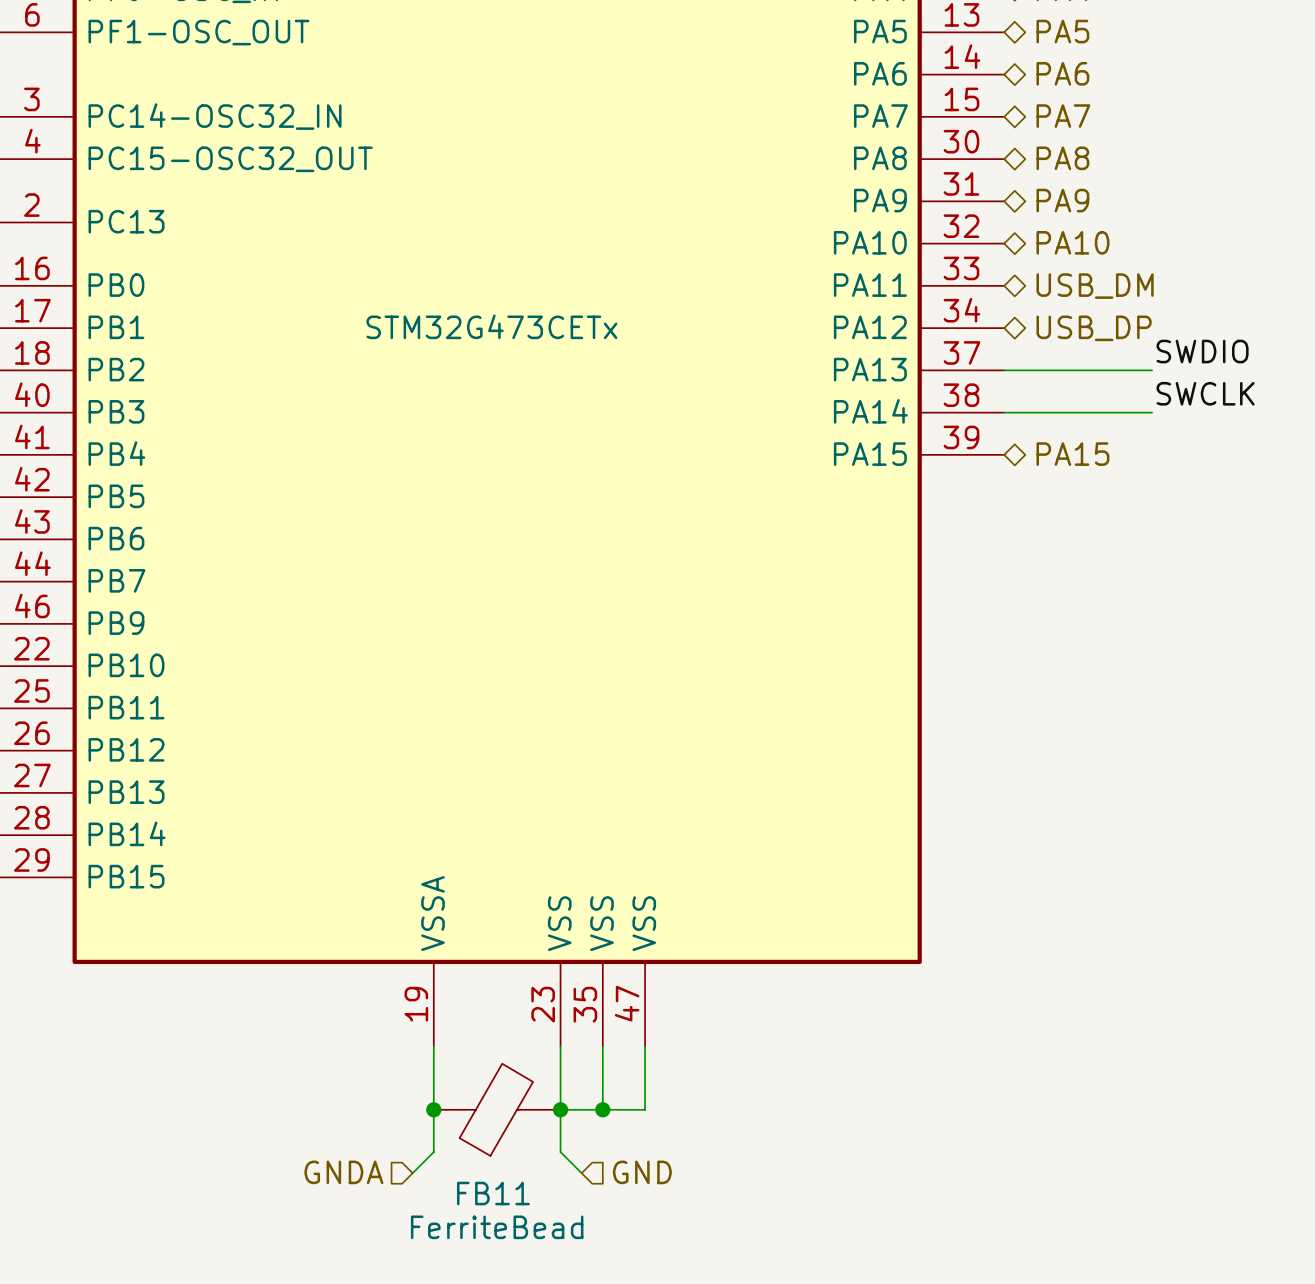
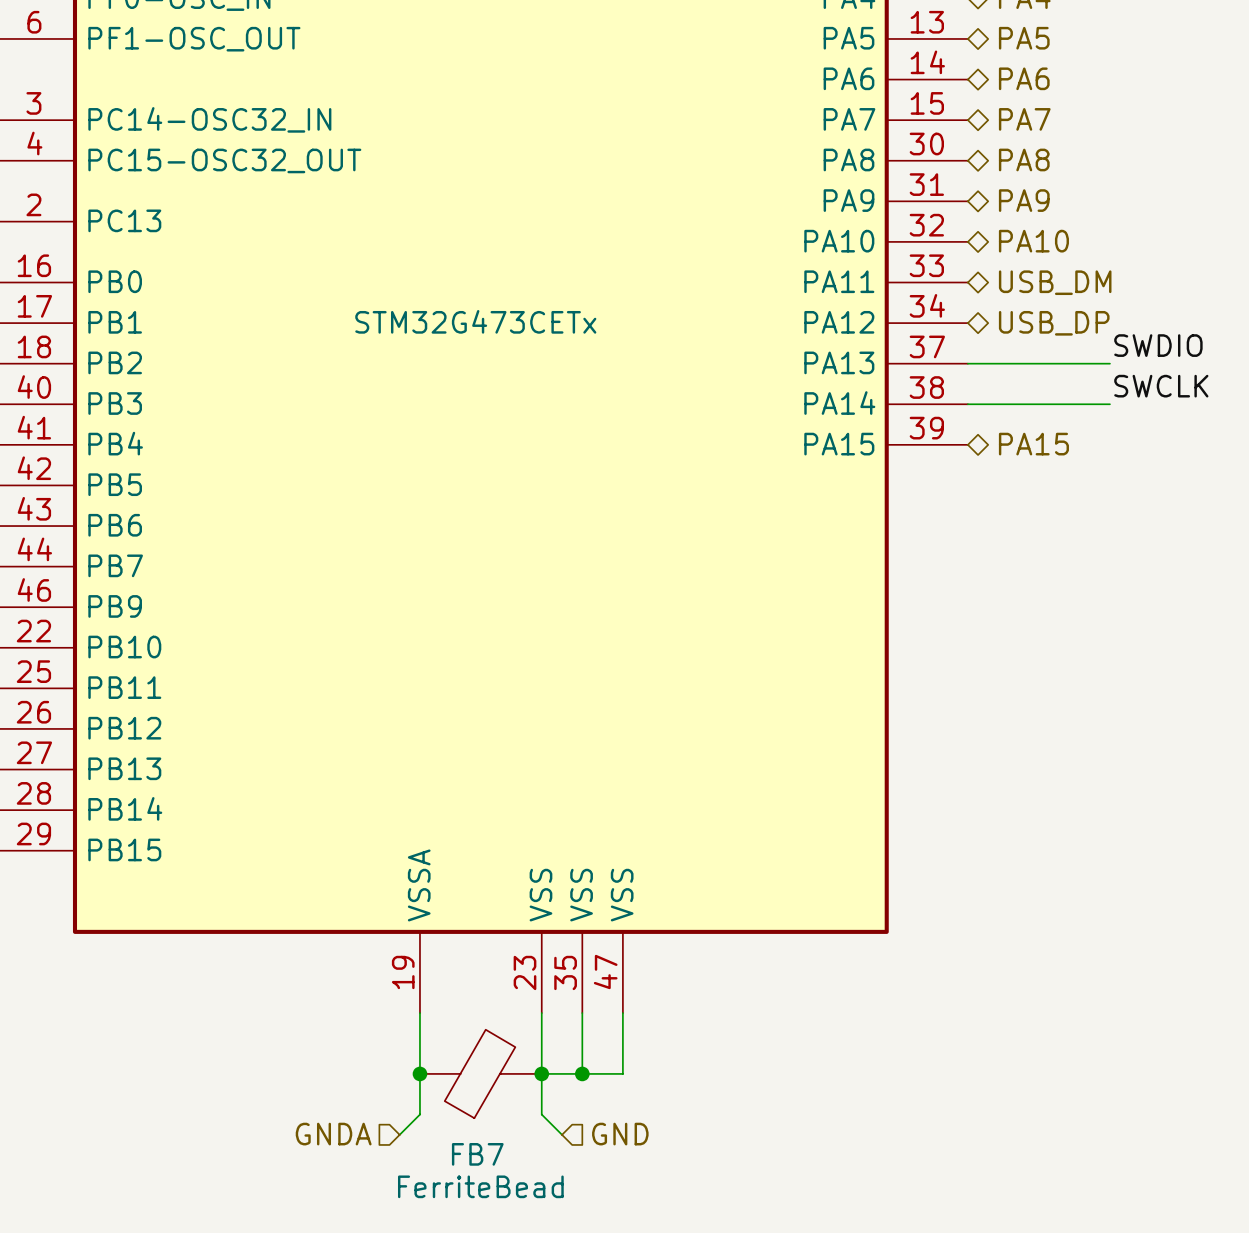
FB11 name: FB11 (493, 1193) -> FB7 (477, 1154)

